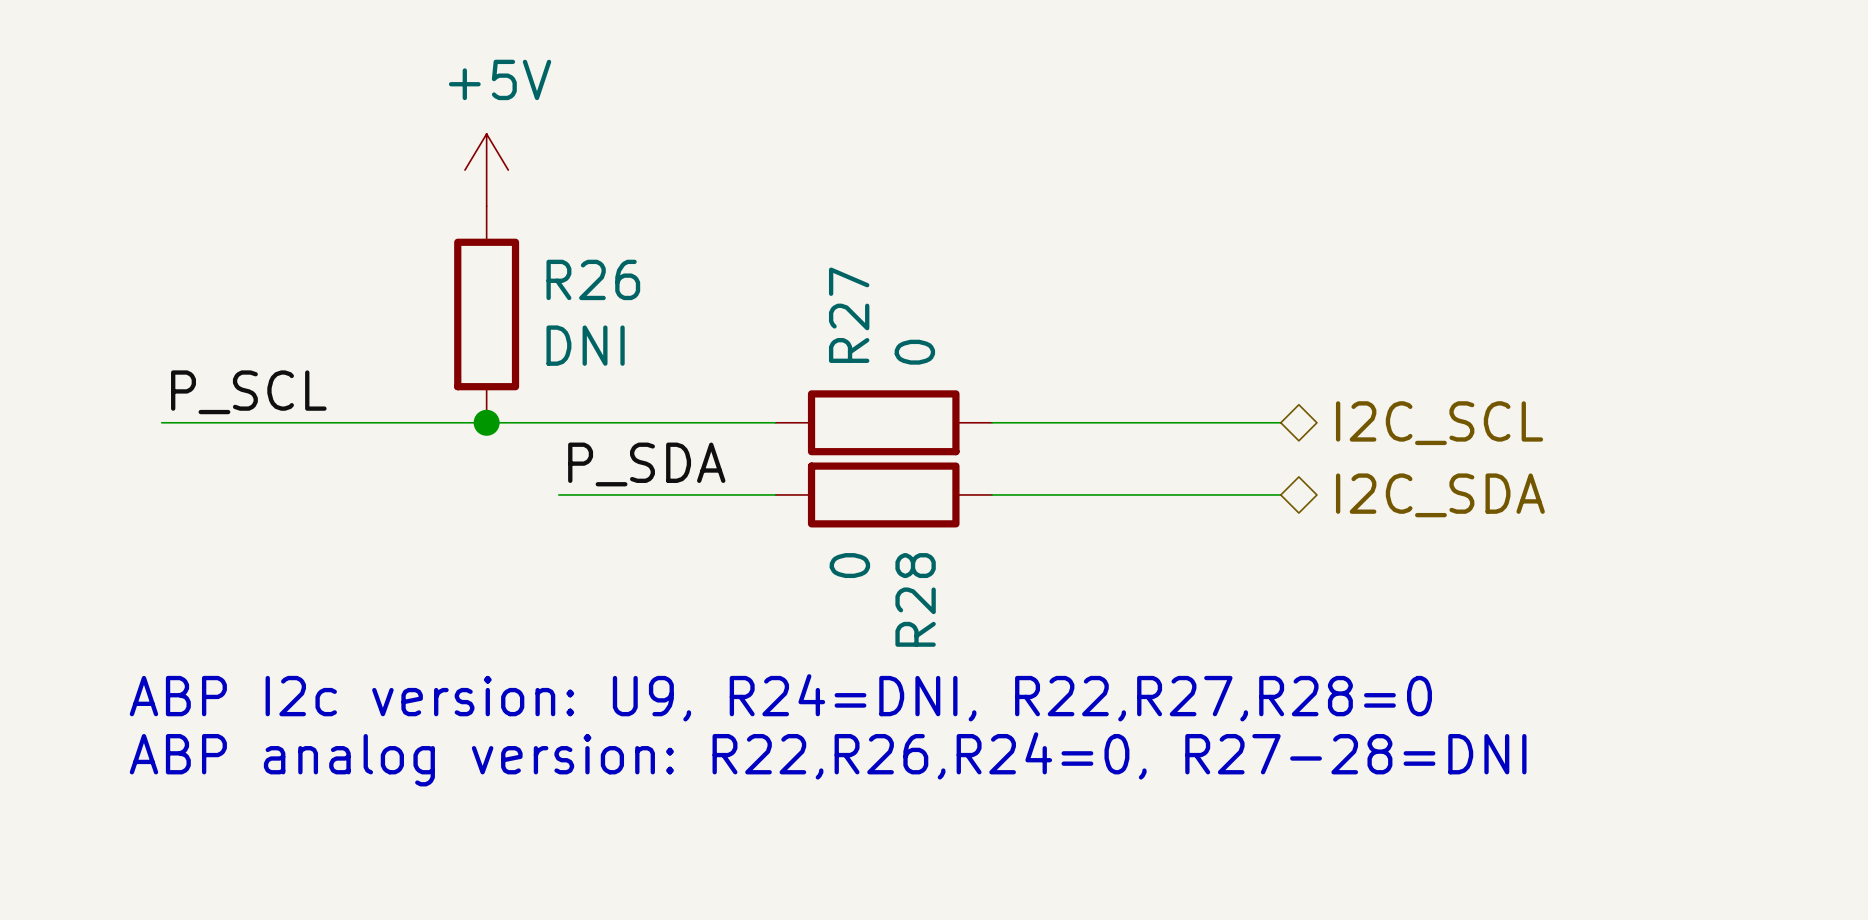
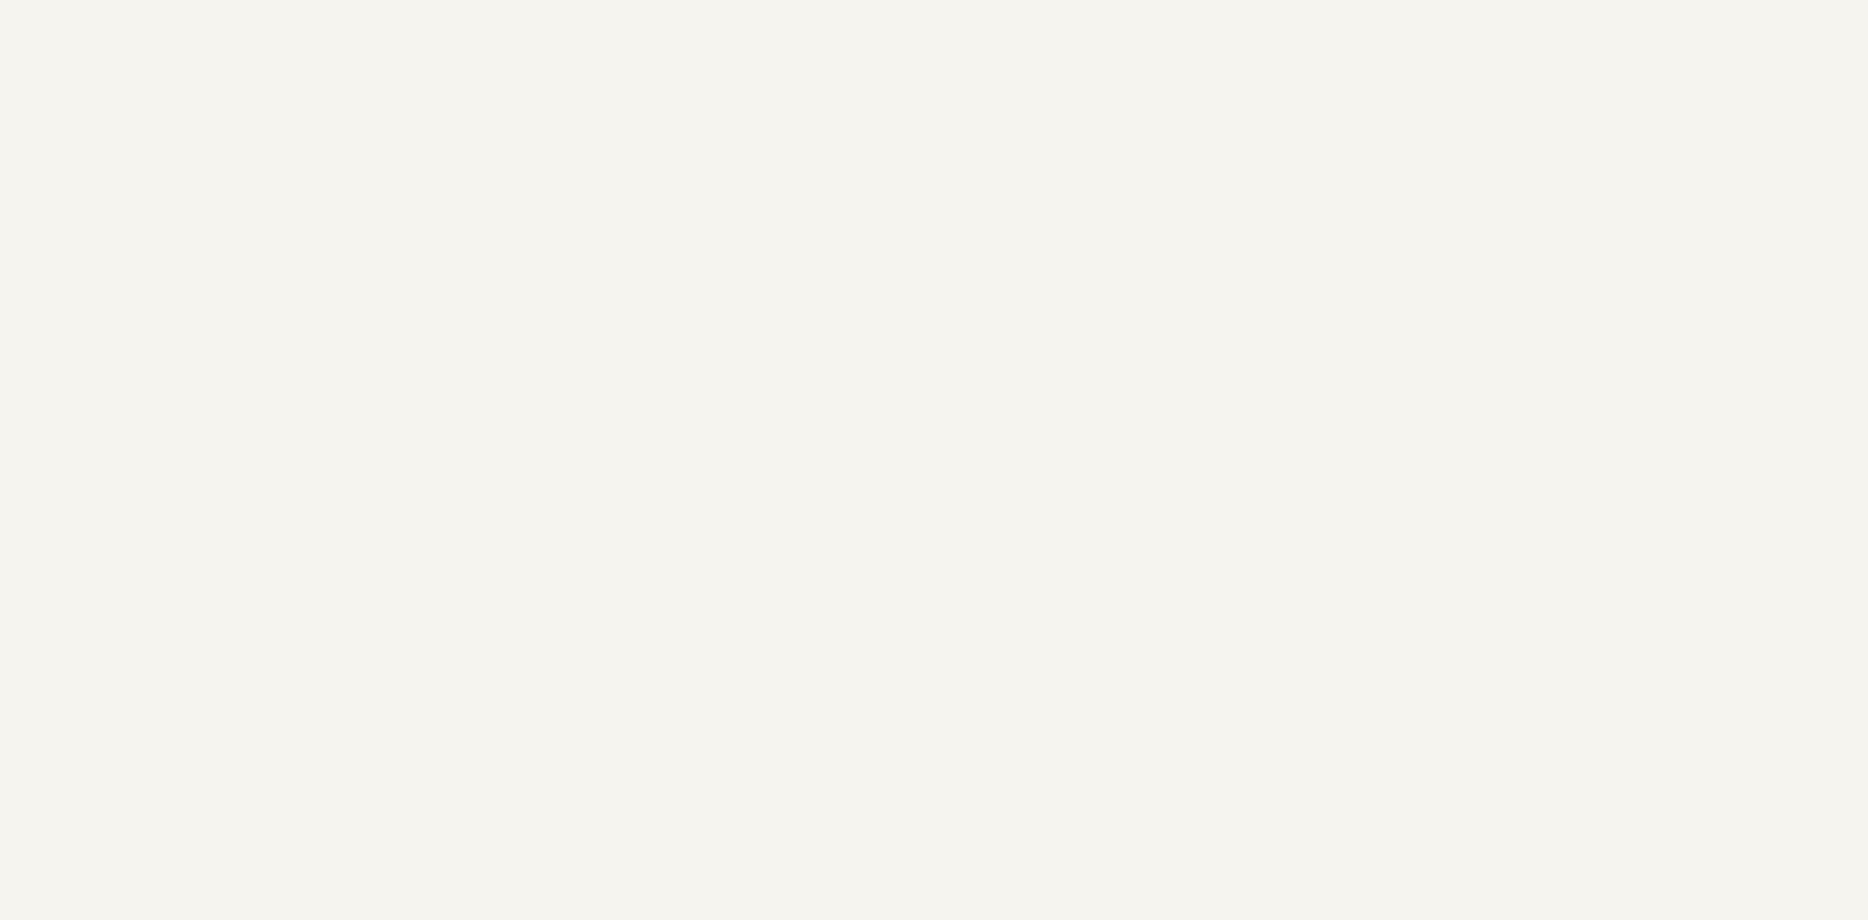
power symbol: +5V (486, 170) -> none
R26: DNI (486, 314) -> none
label: P_SCL (248, 392) -> none
wire: (161, 422) (775, 422) -> none
junction: (486, 422) -> none
R27: 0 (883, 422) -> none
wire: (992, 422) (1280, 422) -> none
hierarchical label: I2C_SCL (1439, 423) -> none
label: P_SDA (646, 464) -> none
wire: (558, 494) (775, 494) -> none
R28: 0 (883, 494) -> none
wire: (992, 494) (1280, 494) -> none
hierarchical label: I2C_SDA (1440, 495) -> none
text: ABP I2c version: U9, R24=DNI, R22,R27,R28=0 (780, 697) -> none
text: ABP analog version: R22,R26,R24=0, R27-28=DNI (828, 759) -> none

